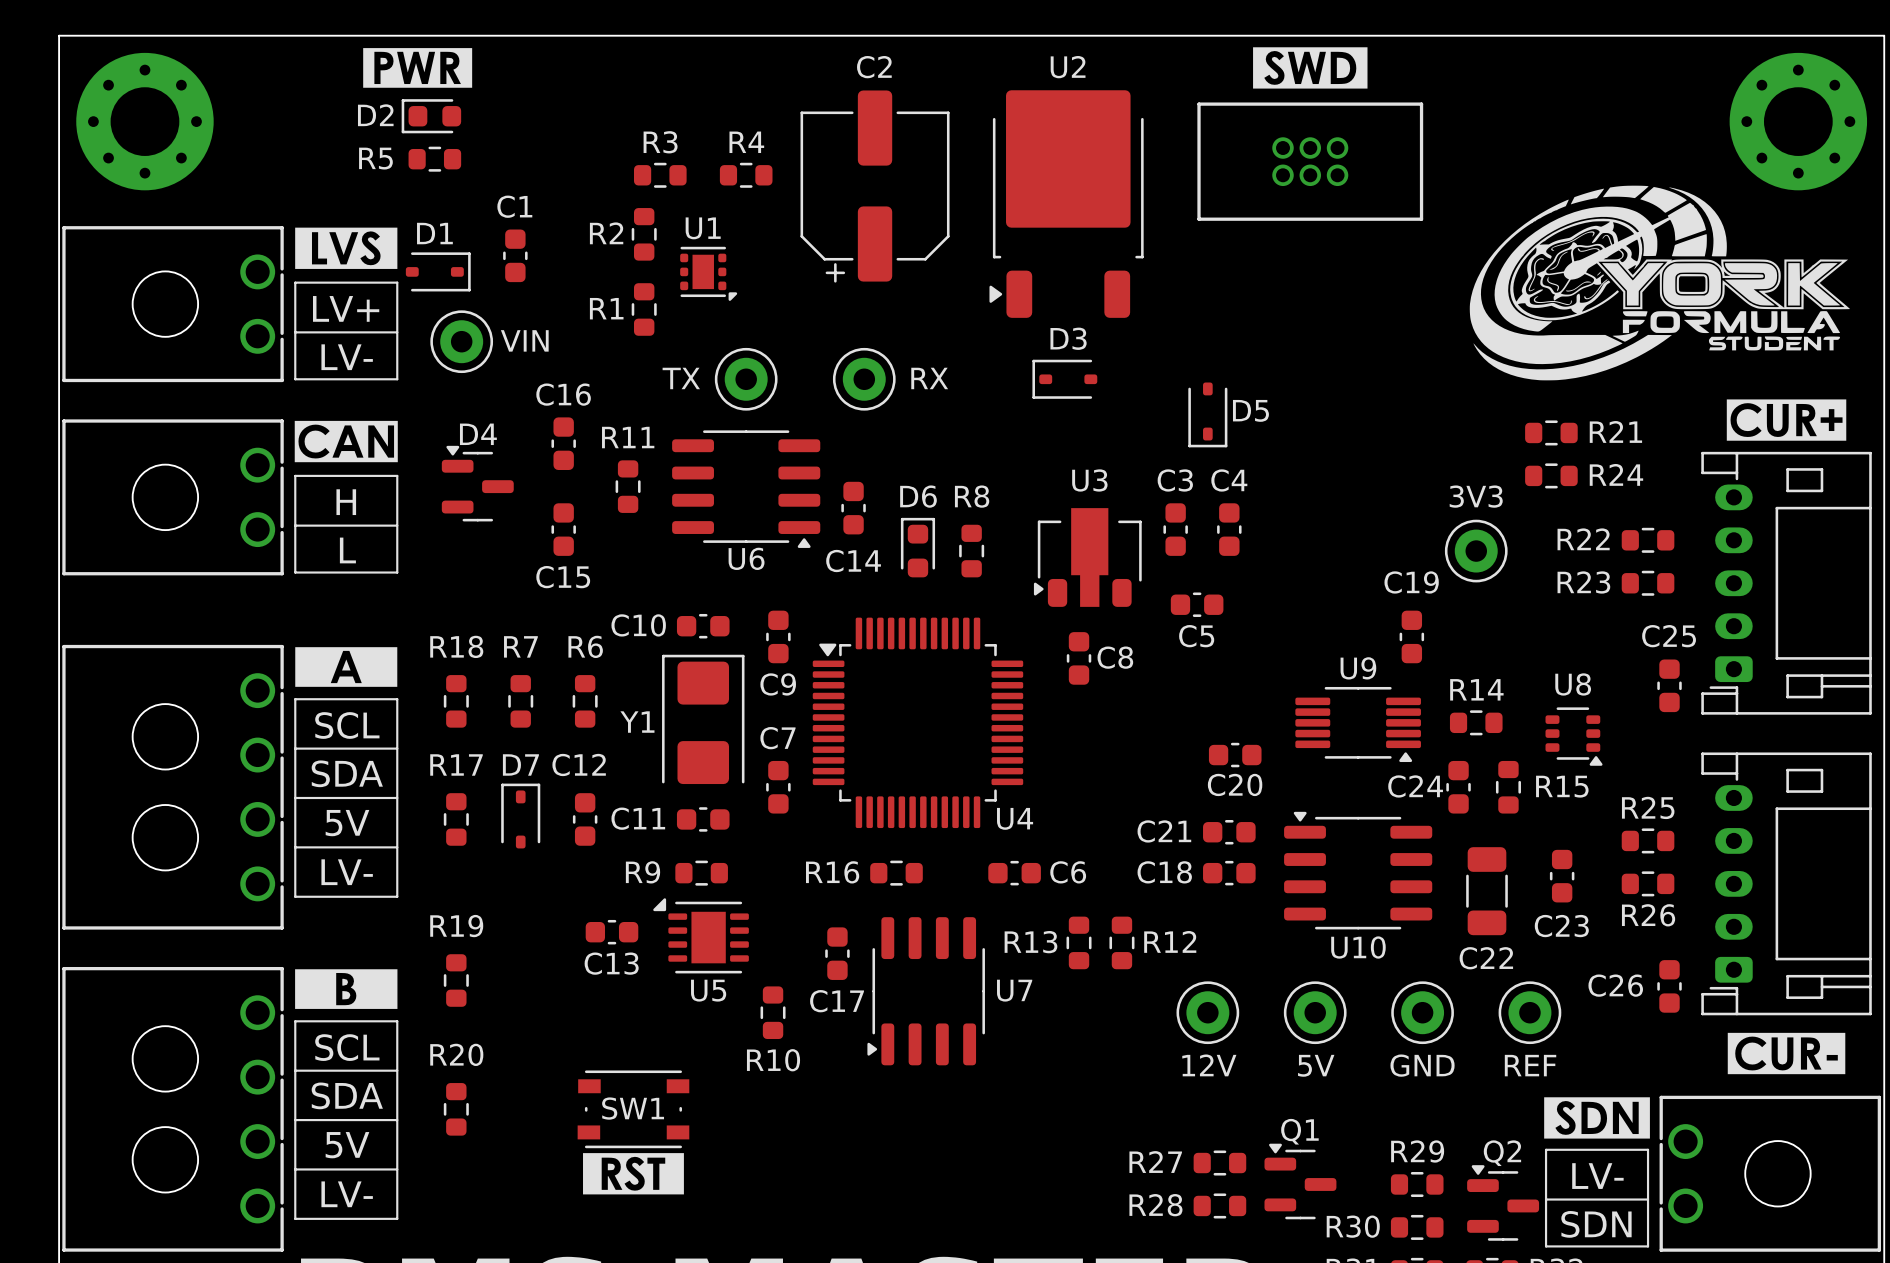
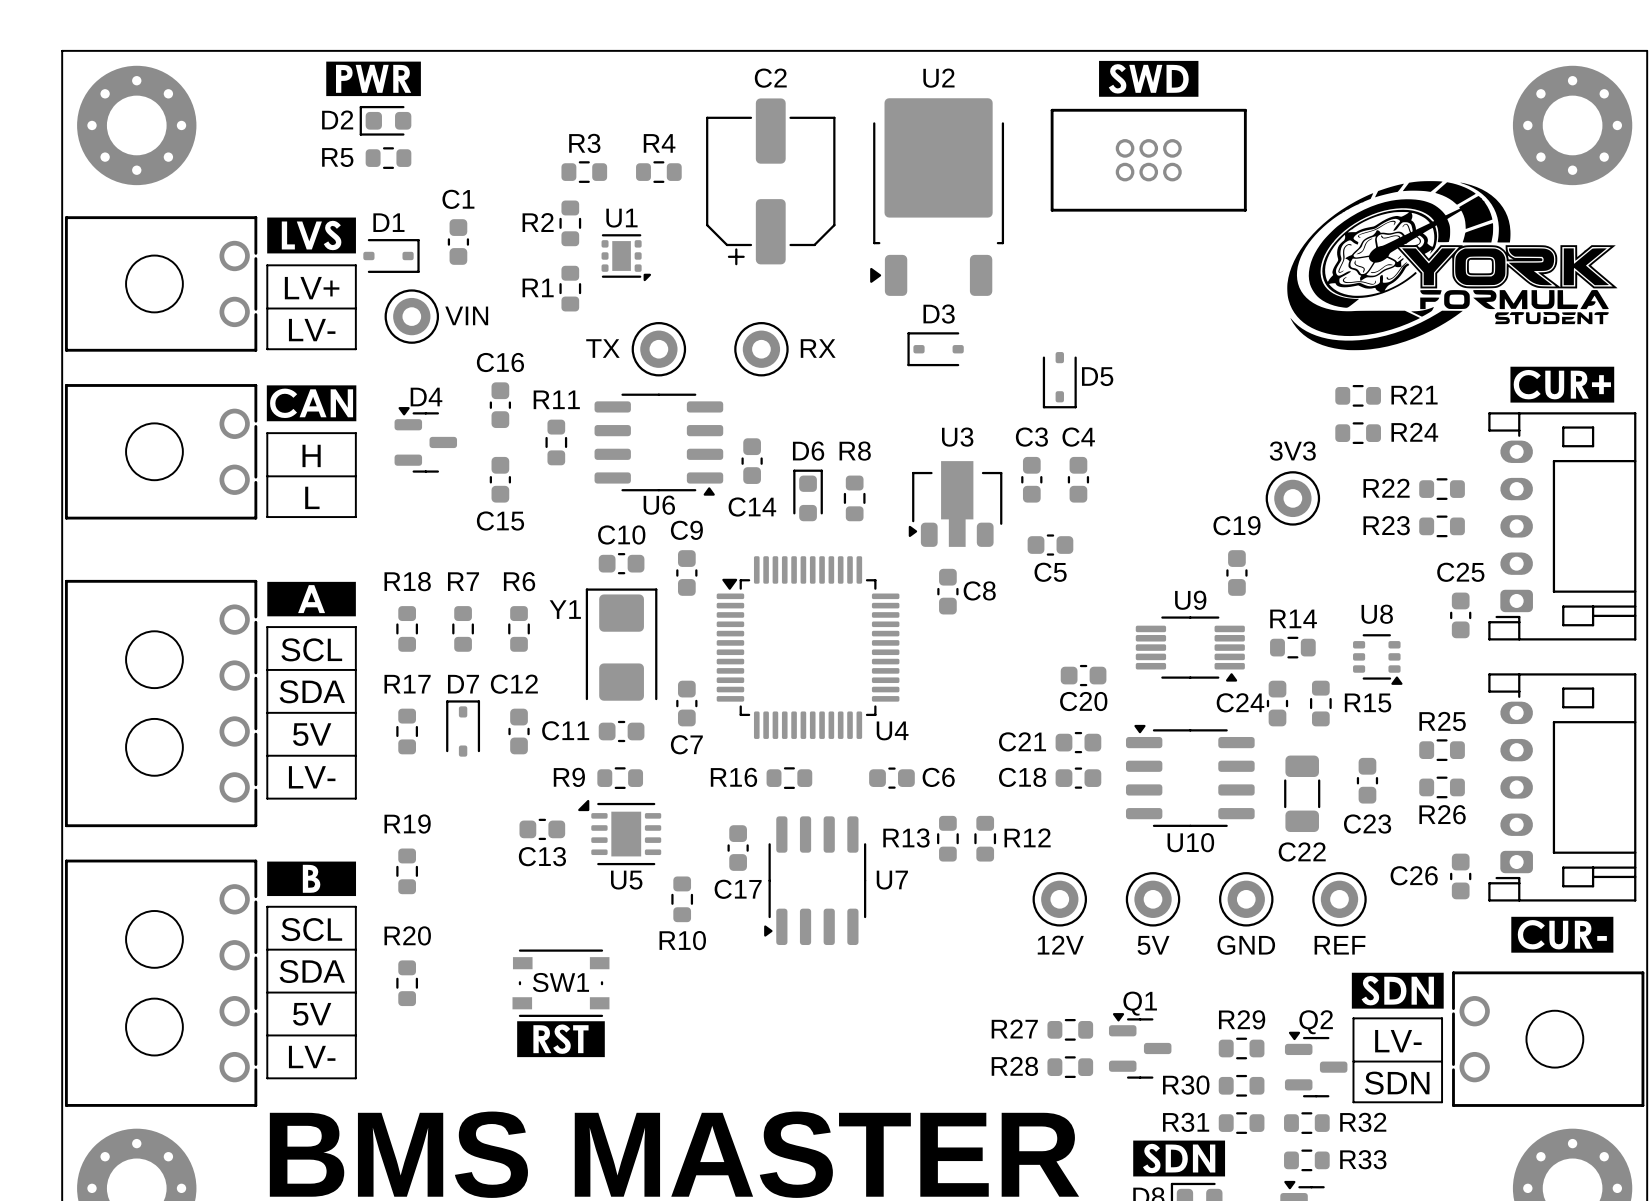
C10 name position: C10 (638, 625) -> C10 (621, 534)
C9 name position: C9 (778, 684) -> C9 (686, 530)
Y1 name position: Y1 (637, 722) -> Y1 (565, 609)
C7 name position: C7 (777, 738) -> C7 (686, 744)

